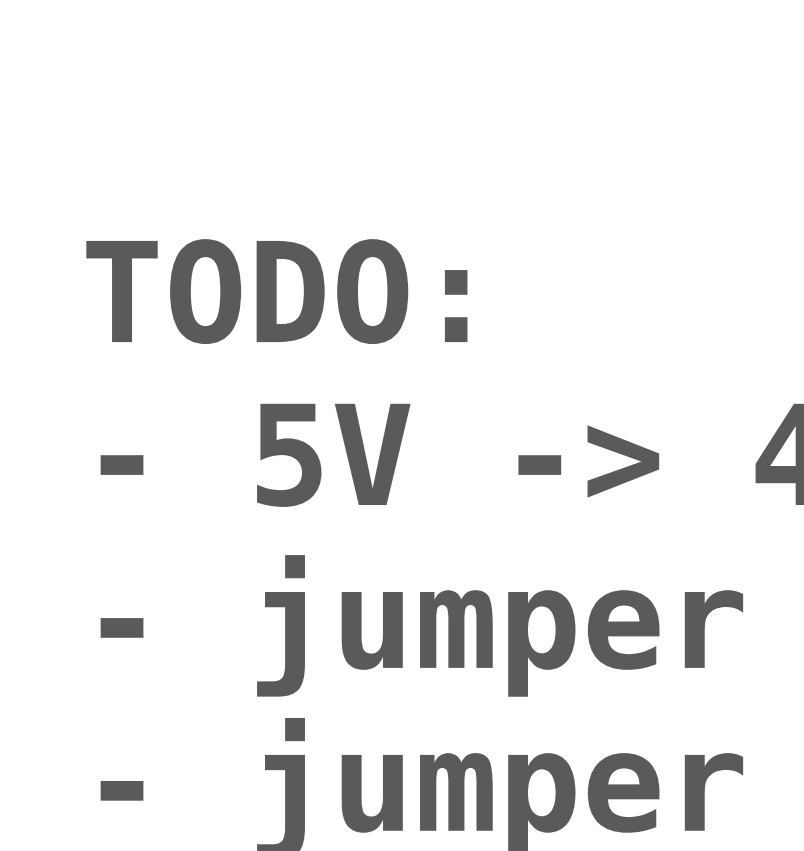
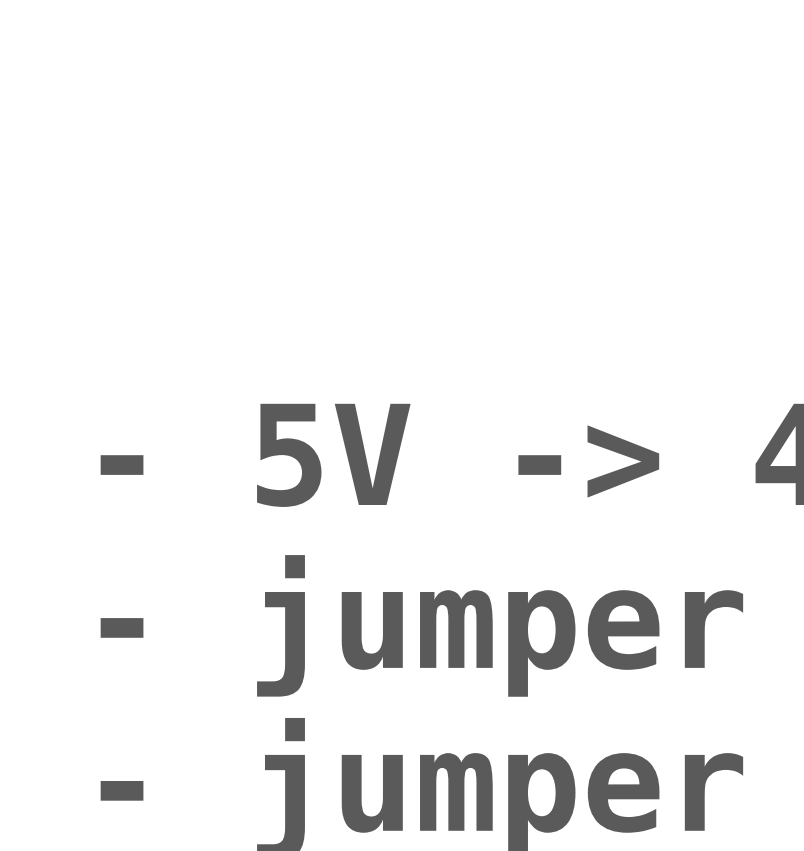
text: TODO: (276, 291) -> none

